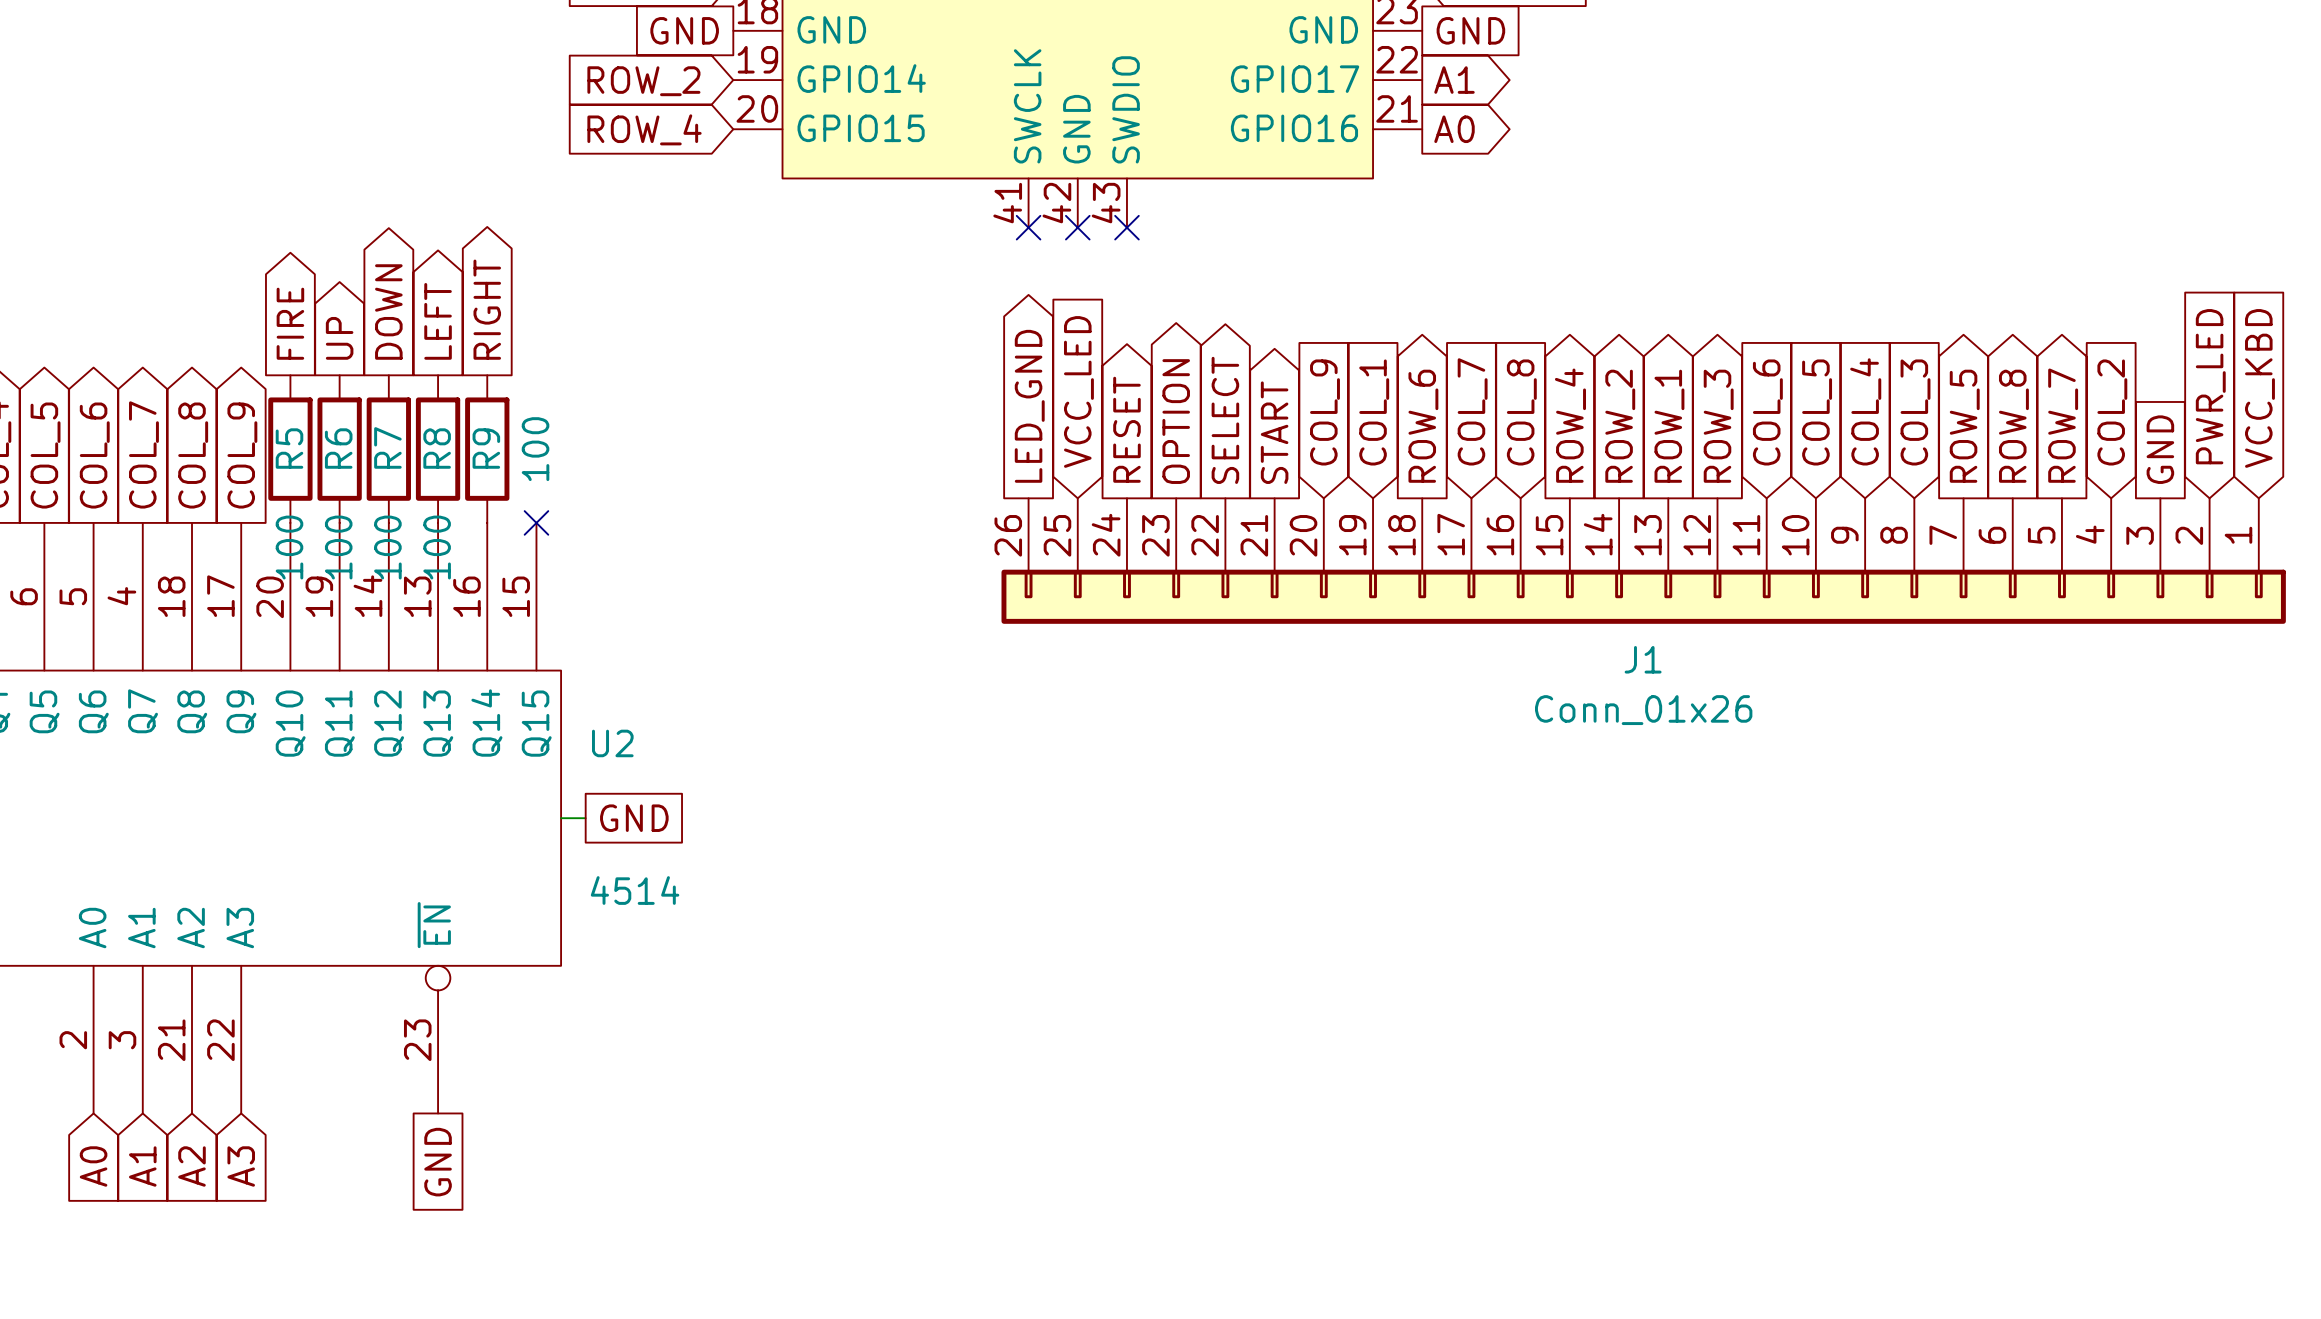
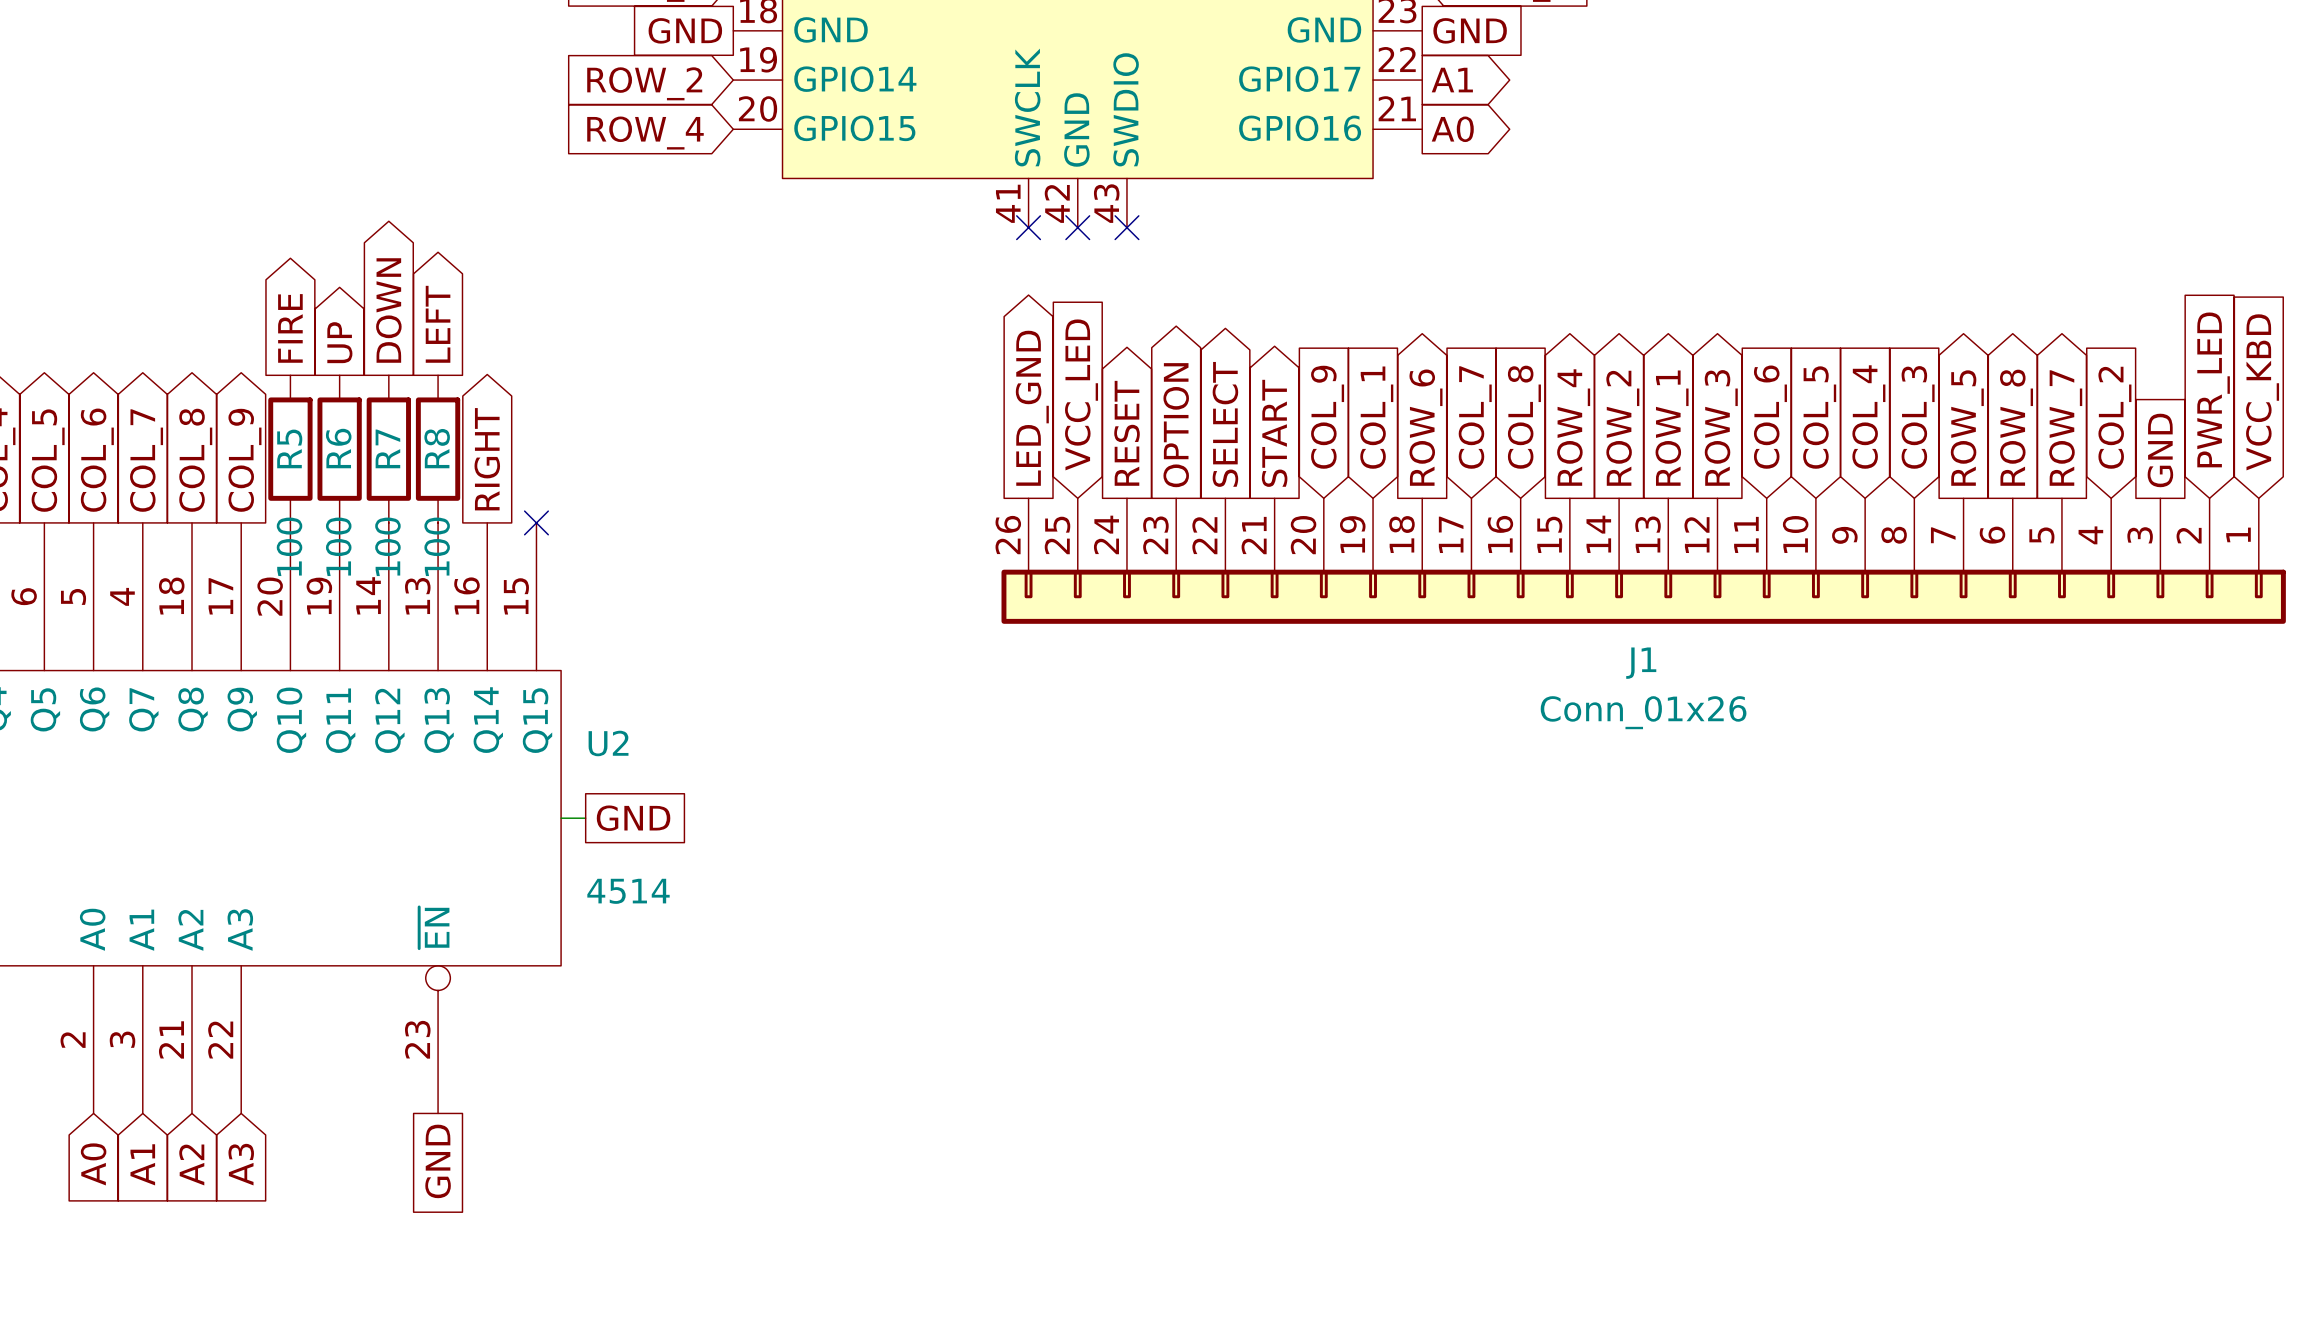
global label position: RIGHT (487, 309) -> RIGHT (487, 459)
R9: 100 (487, 449) -> none

